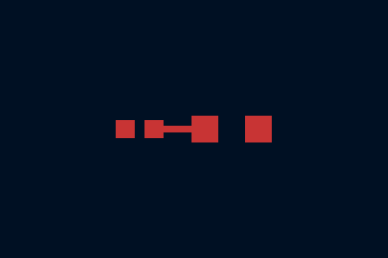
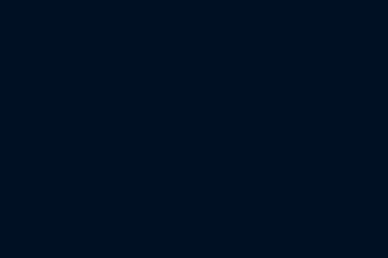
part: (139, 129) -> none
top track: (204, 129) (154, 129) -> none
part: (231, 129) -> none

